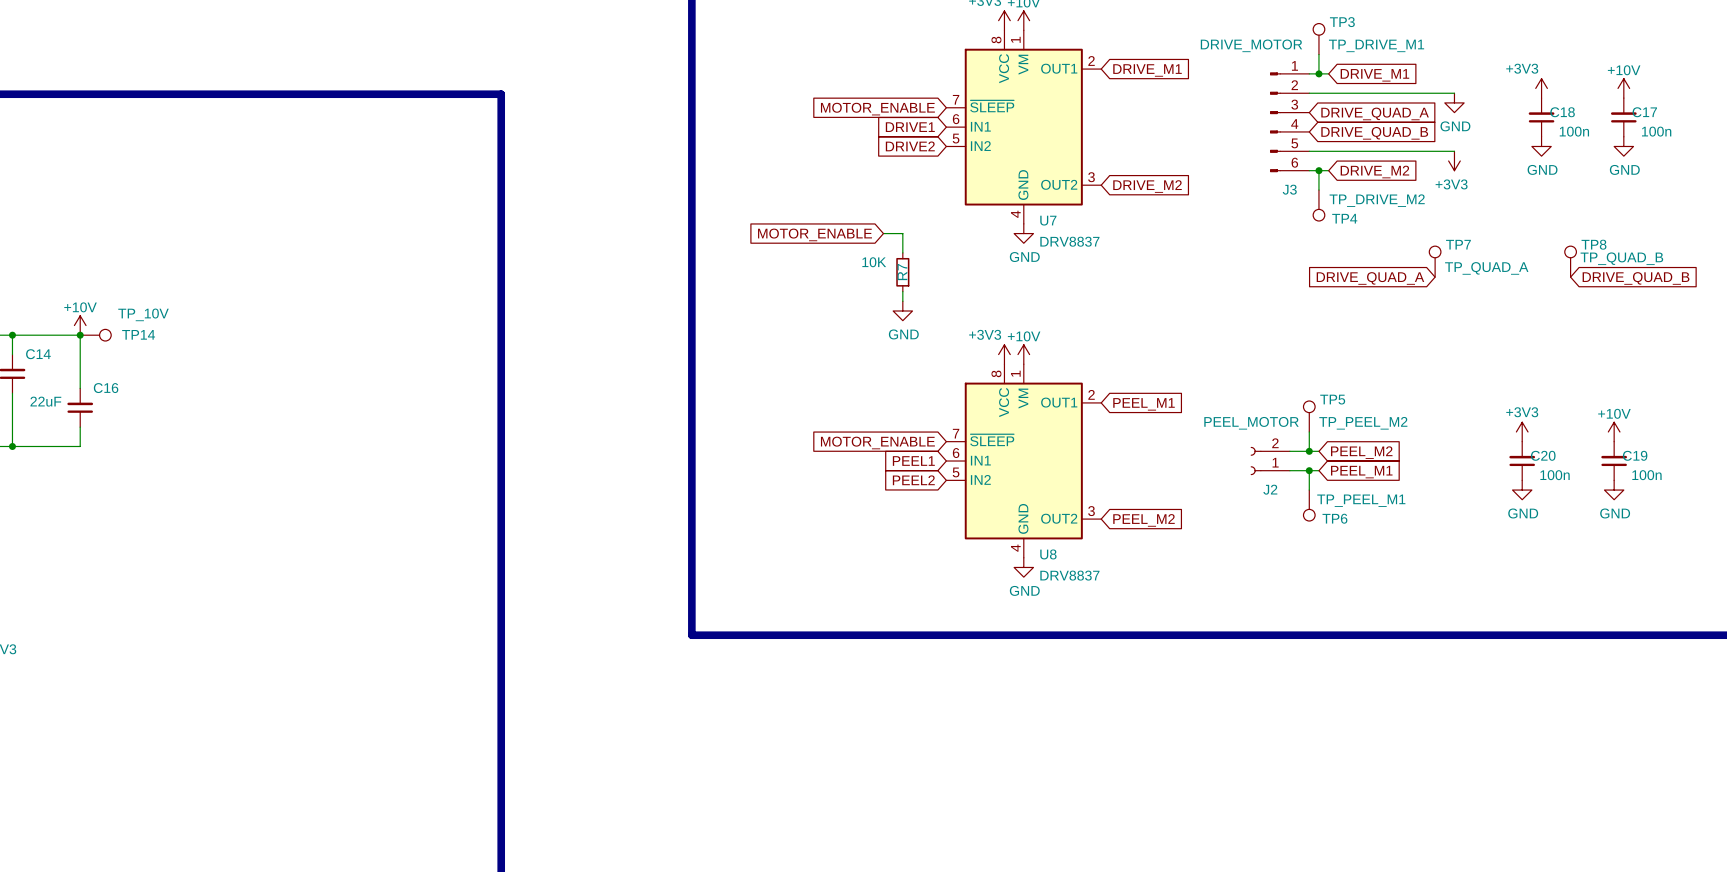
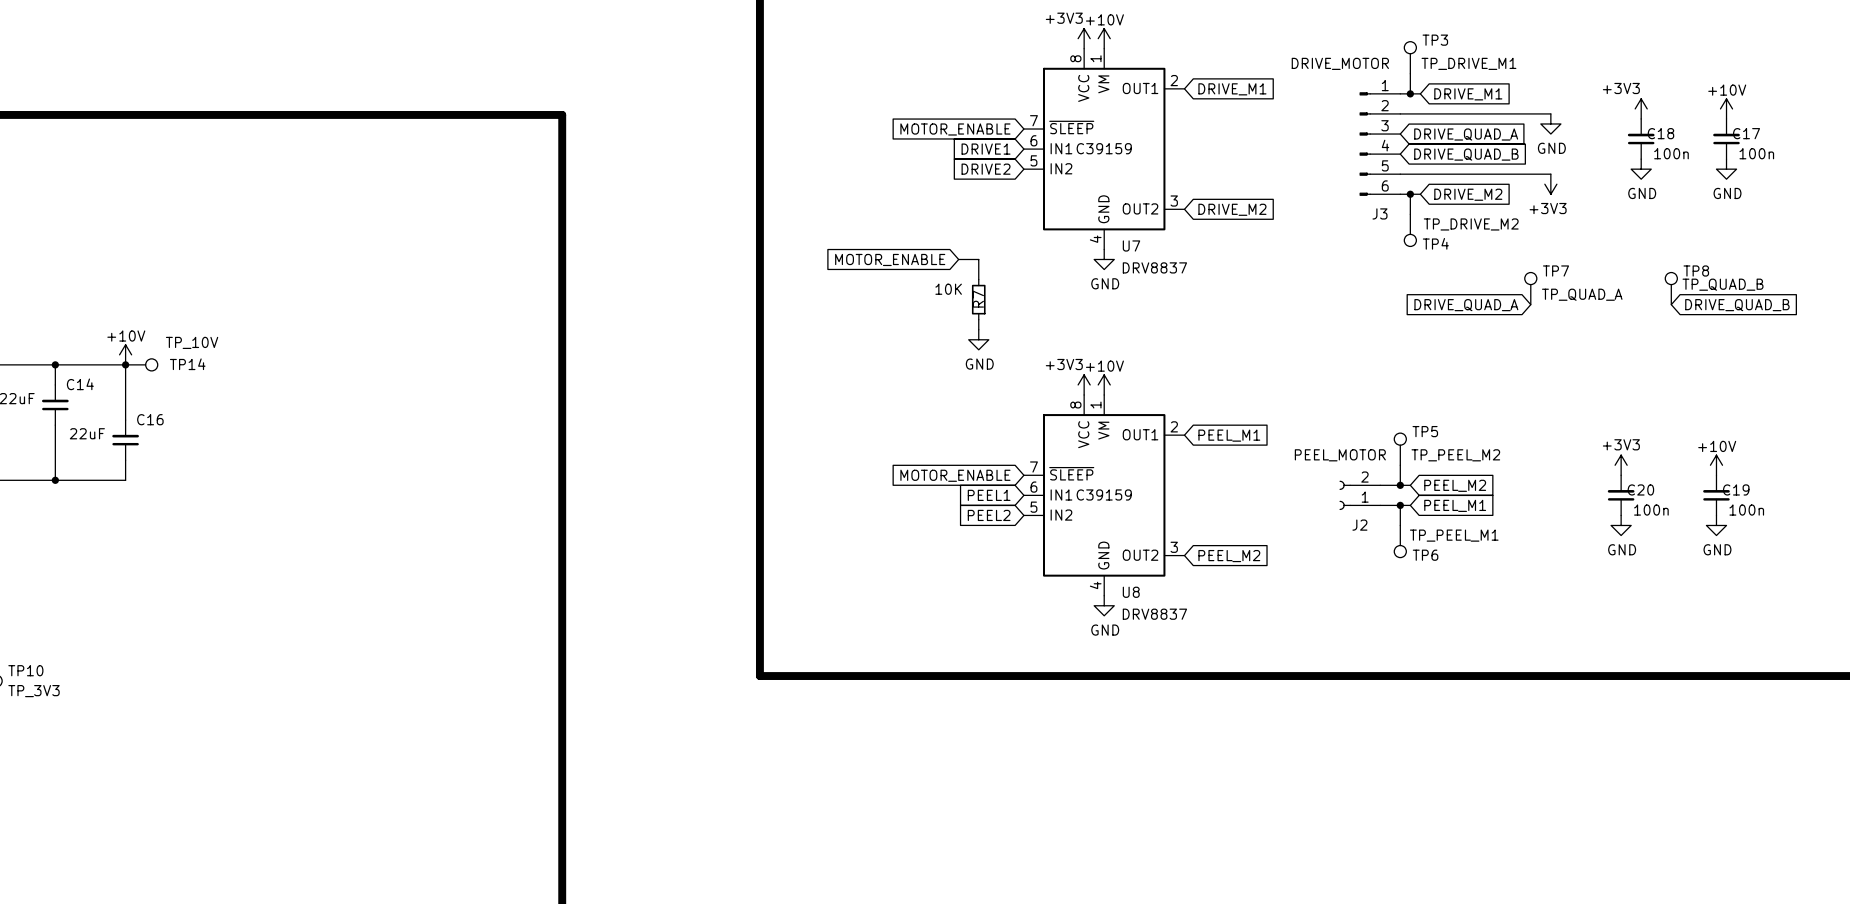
U7 text: none -> C39159 (1104, 148)
U8 text: none -> C39159 (1104, 494)

